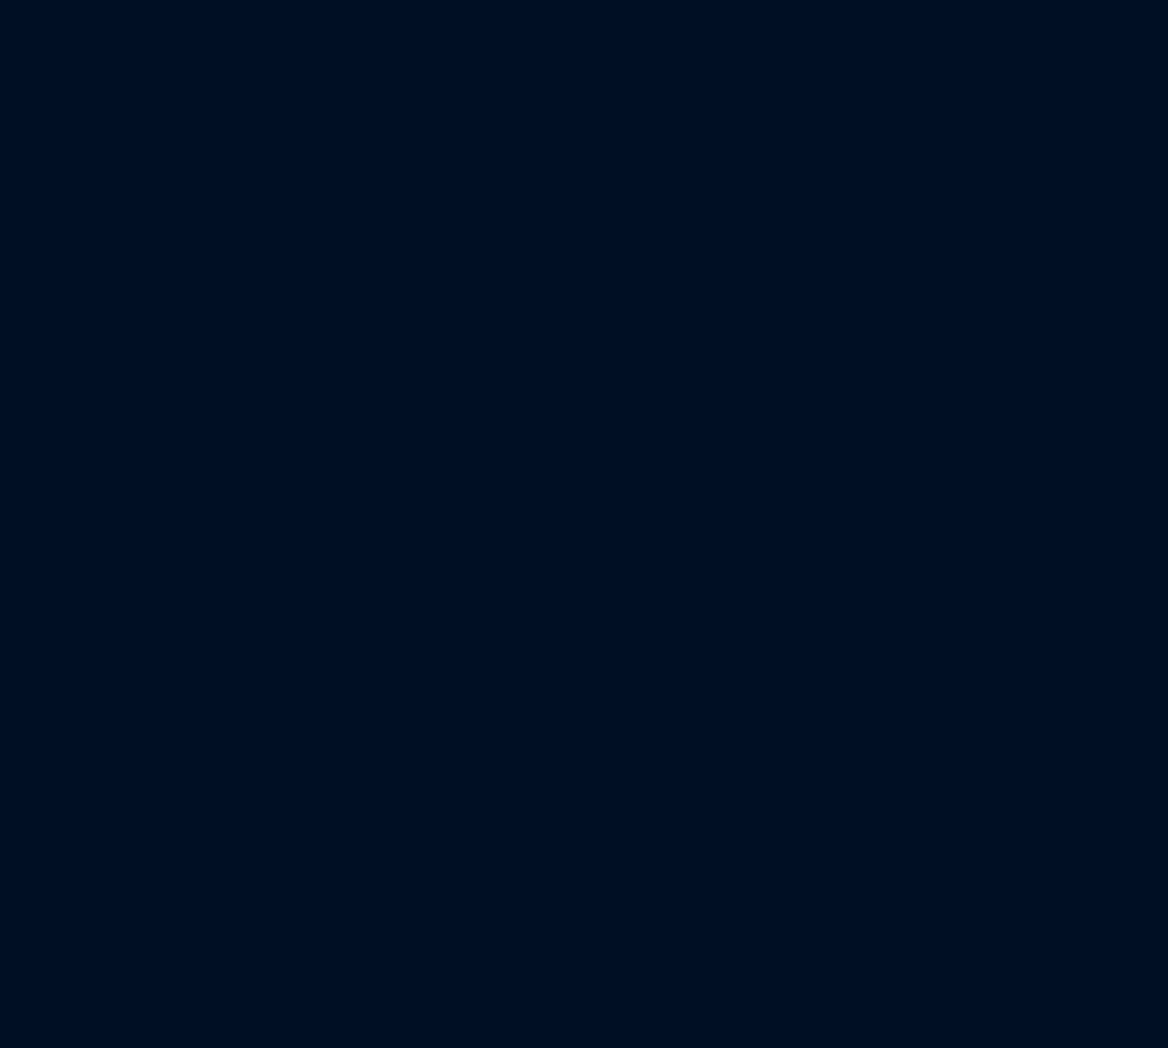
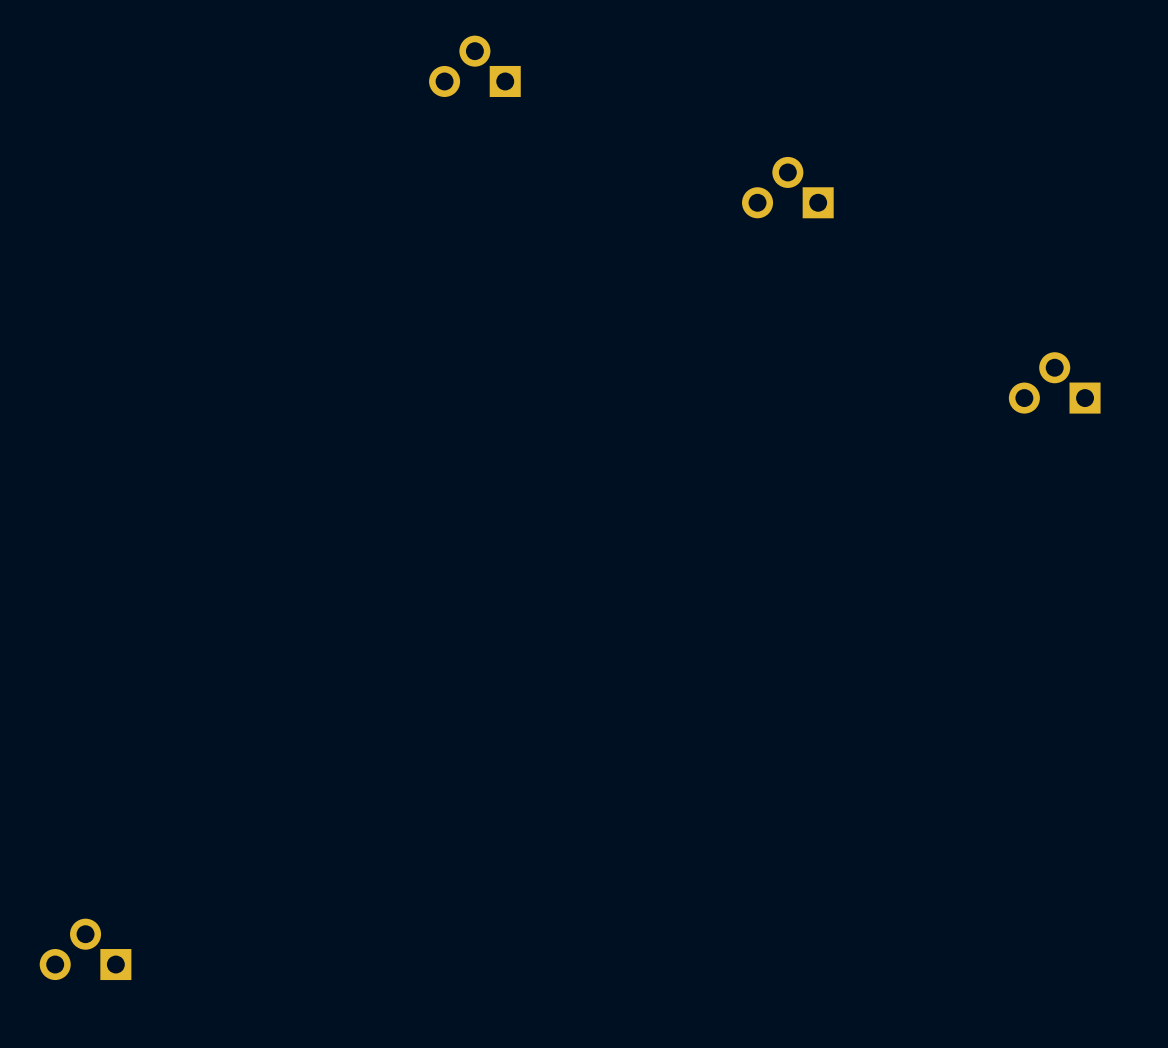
part: none -> (474, 66)
part: none -> (787, 187)
part: none -> (1054, 382)
part: none -> (85, 949)

